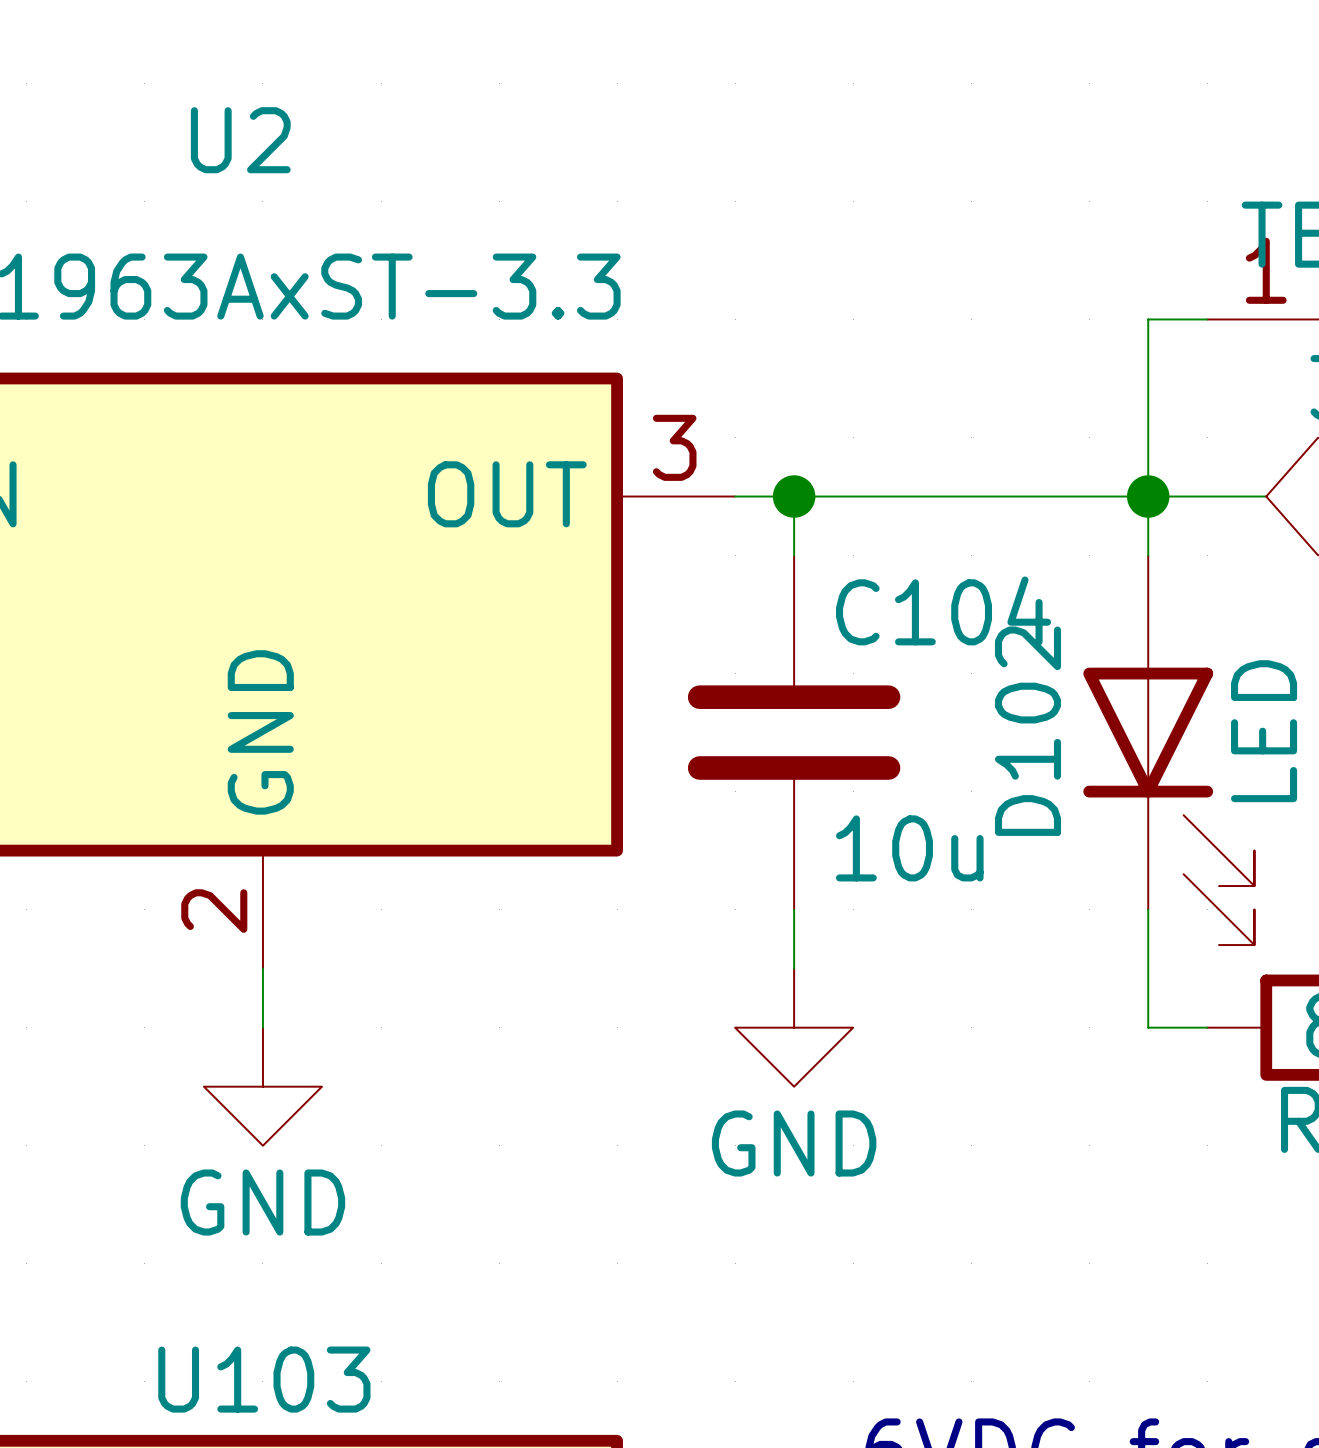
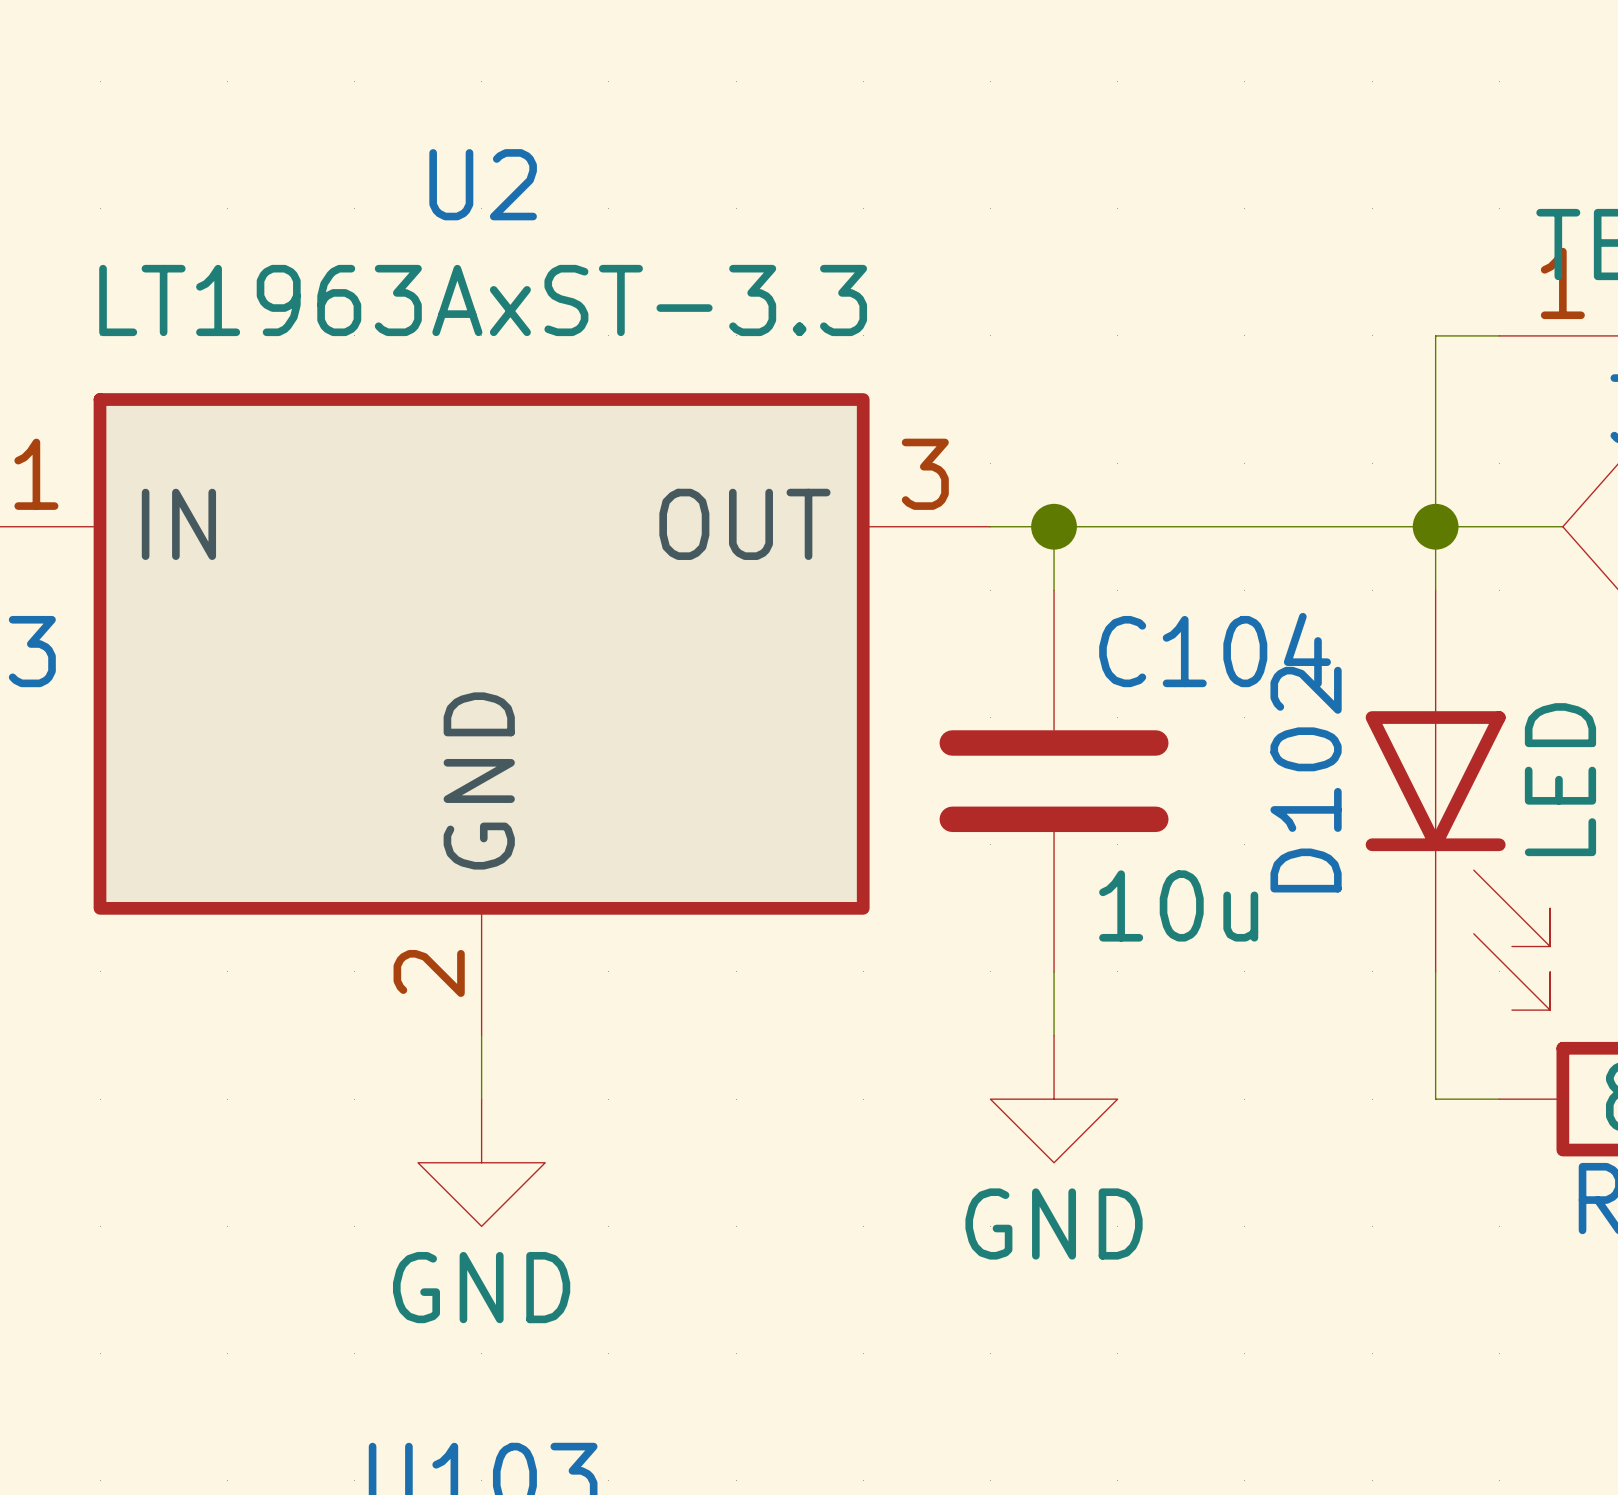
U2 name position: U2 (240, 140) -> U2 (483, 184)

